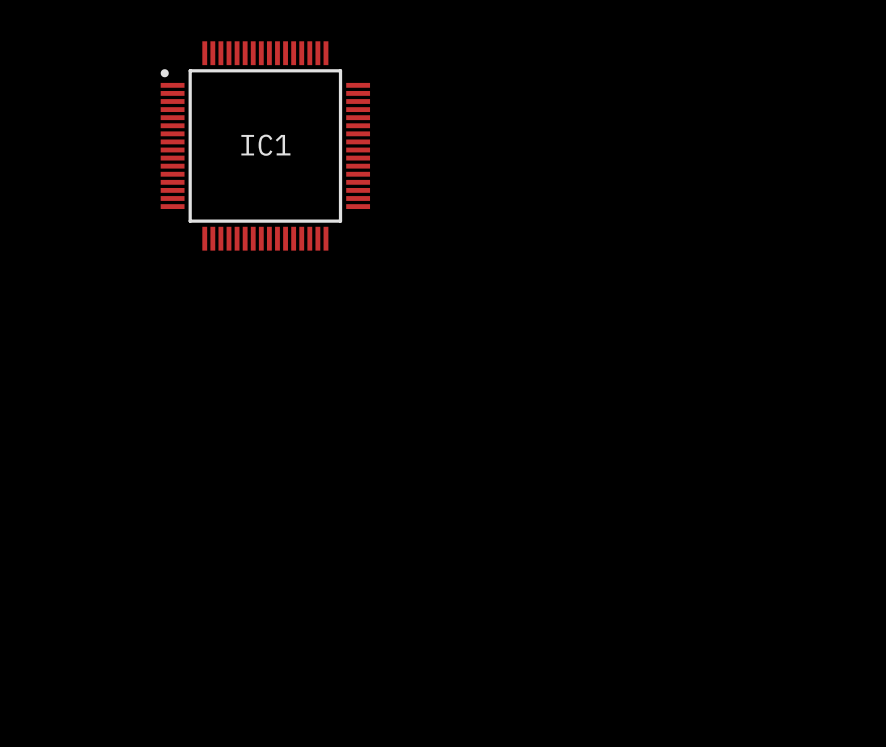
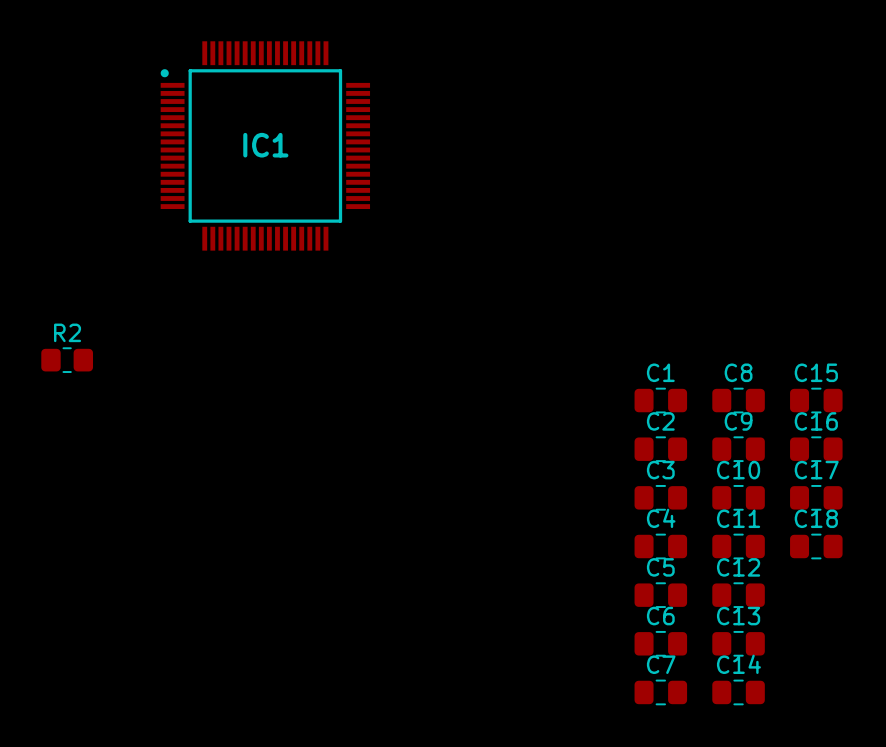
R2: none -> (67, 360)
C1: none -> (660, 400)
C8: none -> (738, 400)
C15: none -> (816, 400)
C2: none -> (660, 449)
C9: none -> (738, 449)
C16: none -> (816, 449)
C3: none -> (660, 497)
C10: none -> (738, 497)
C17: none -> (816, 497)
C4: none -> (660, 546)
C11: none -> (738, 546)
C18: none -> (816, 546)
C5: none -> (660, 595)
C12: none -> (738, 595)
C6: none -> (660, 643)
C13: none -> (738, 643)
C7: none -> (660, 692)
C14: none -> (738, 692)

